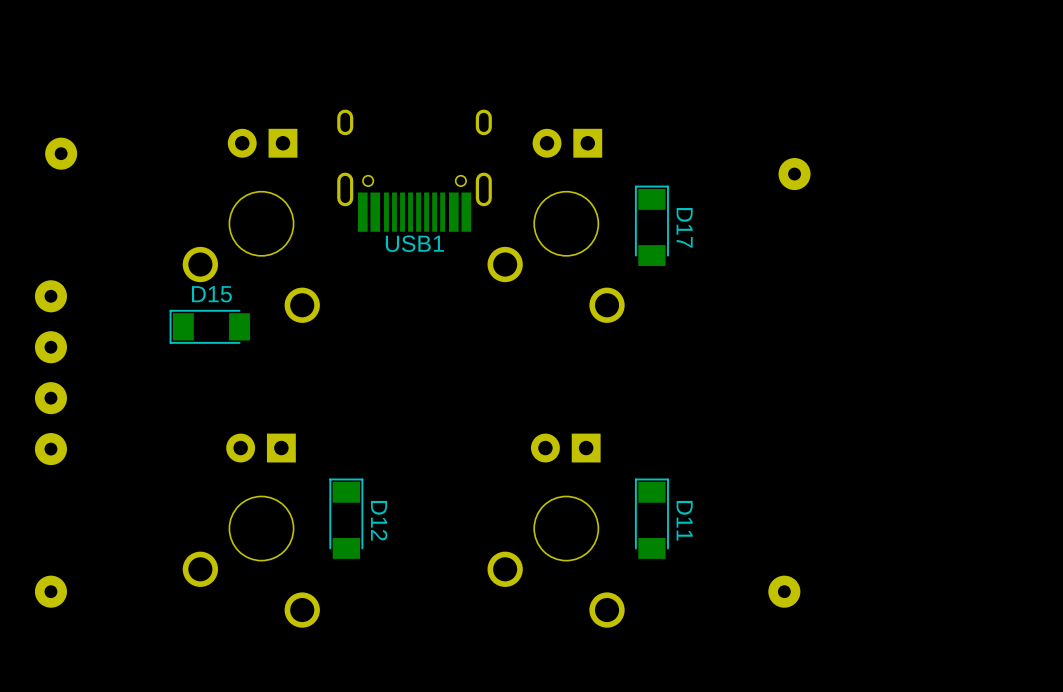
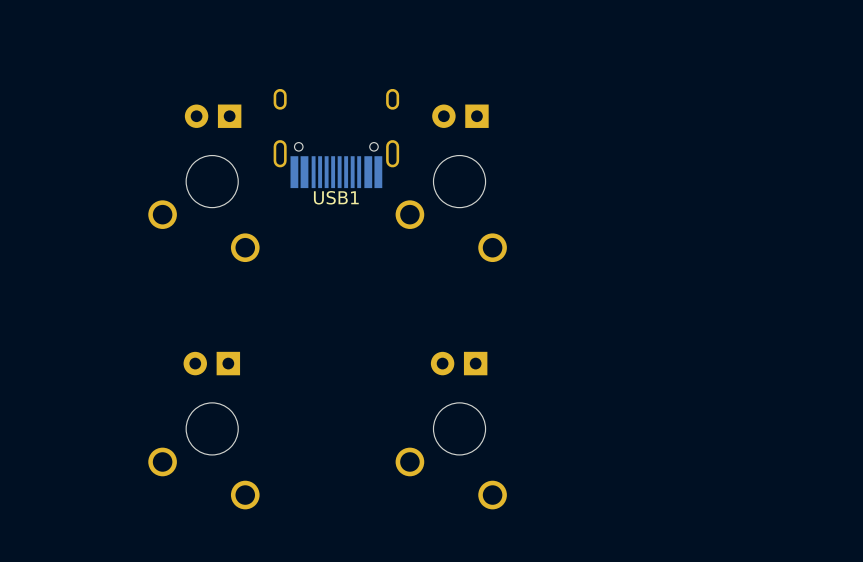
part: (61, 153) -> none
part: (794, 174) -> none
D17: (651, 225) -> none
part: (50, 296) -> none
D15: (209, 326) -> none
part: (50, 347) -> none
part: (50, 398) -> none
part: (50, 449) -> none
D12: (346, 518) -> none
D11: (651, 518) -> none
part: (50, 591) -> none
part: (784, 591) -> none

